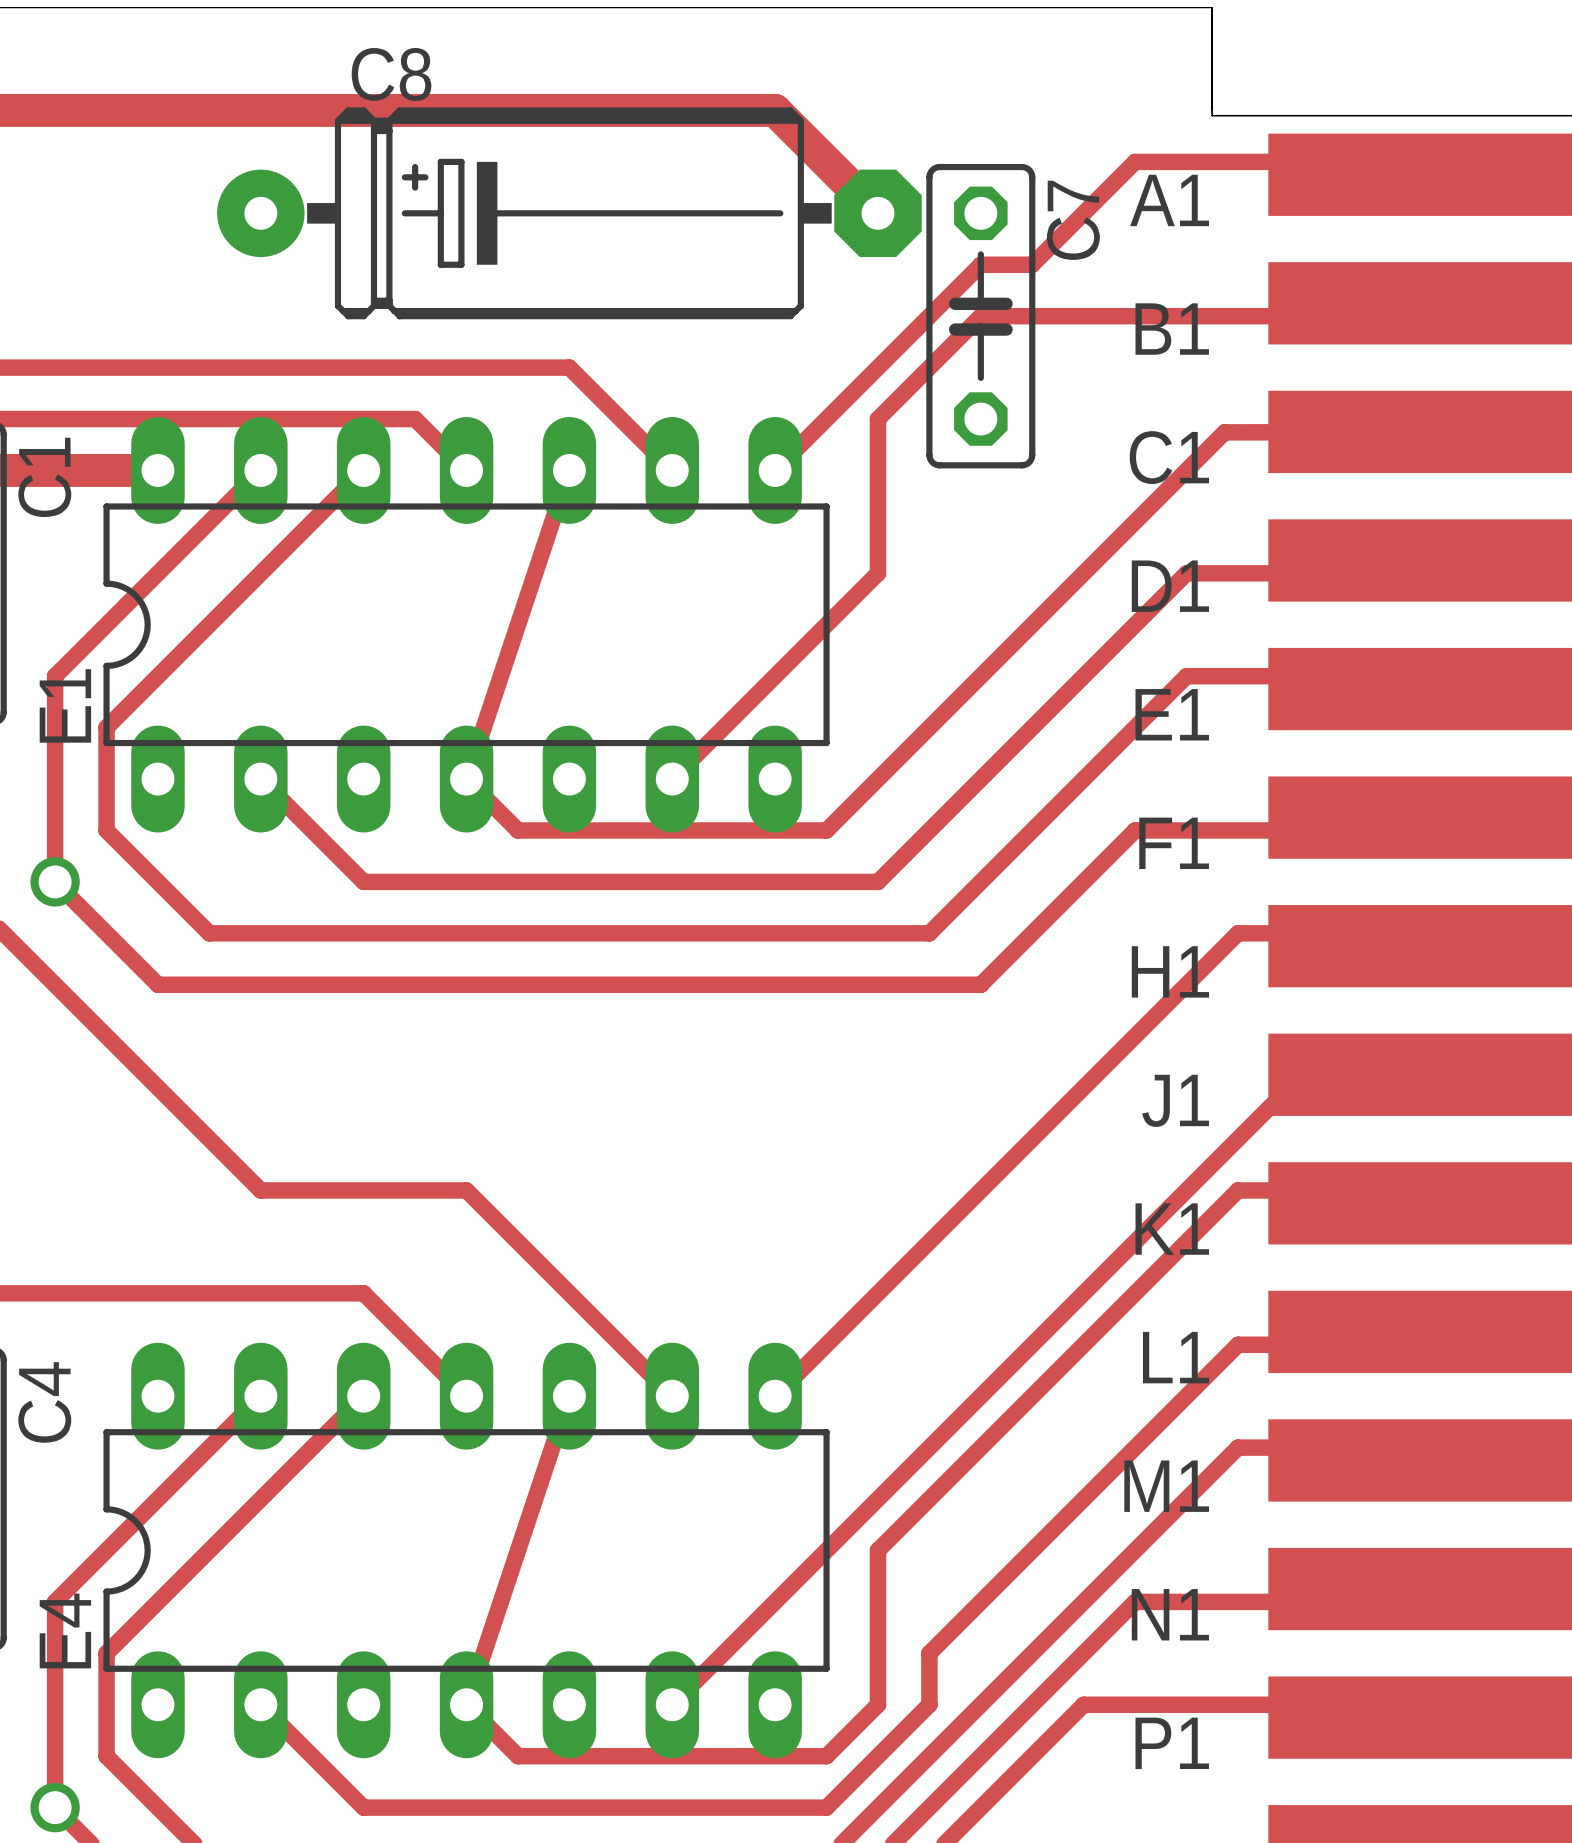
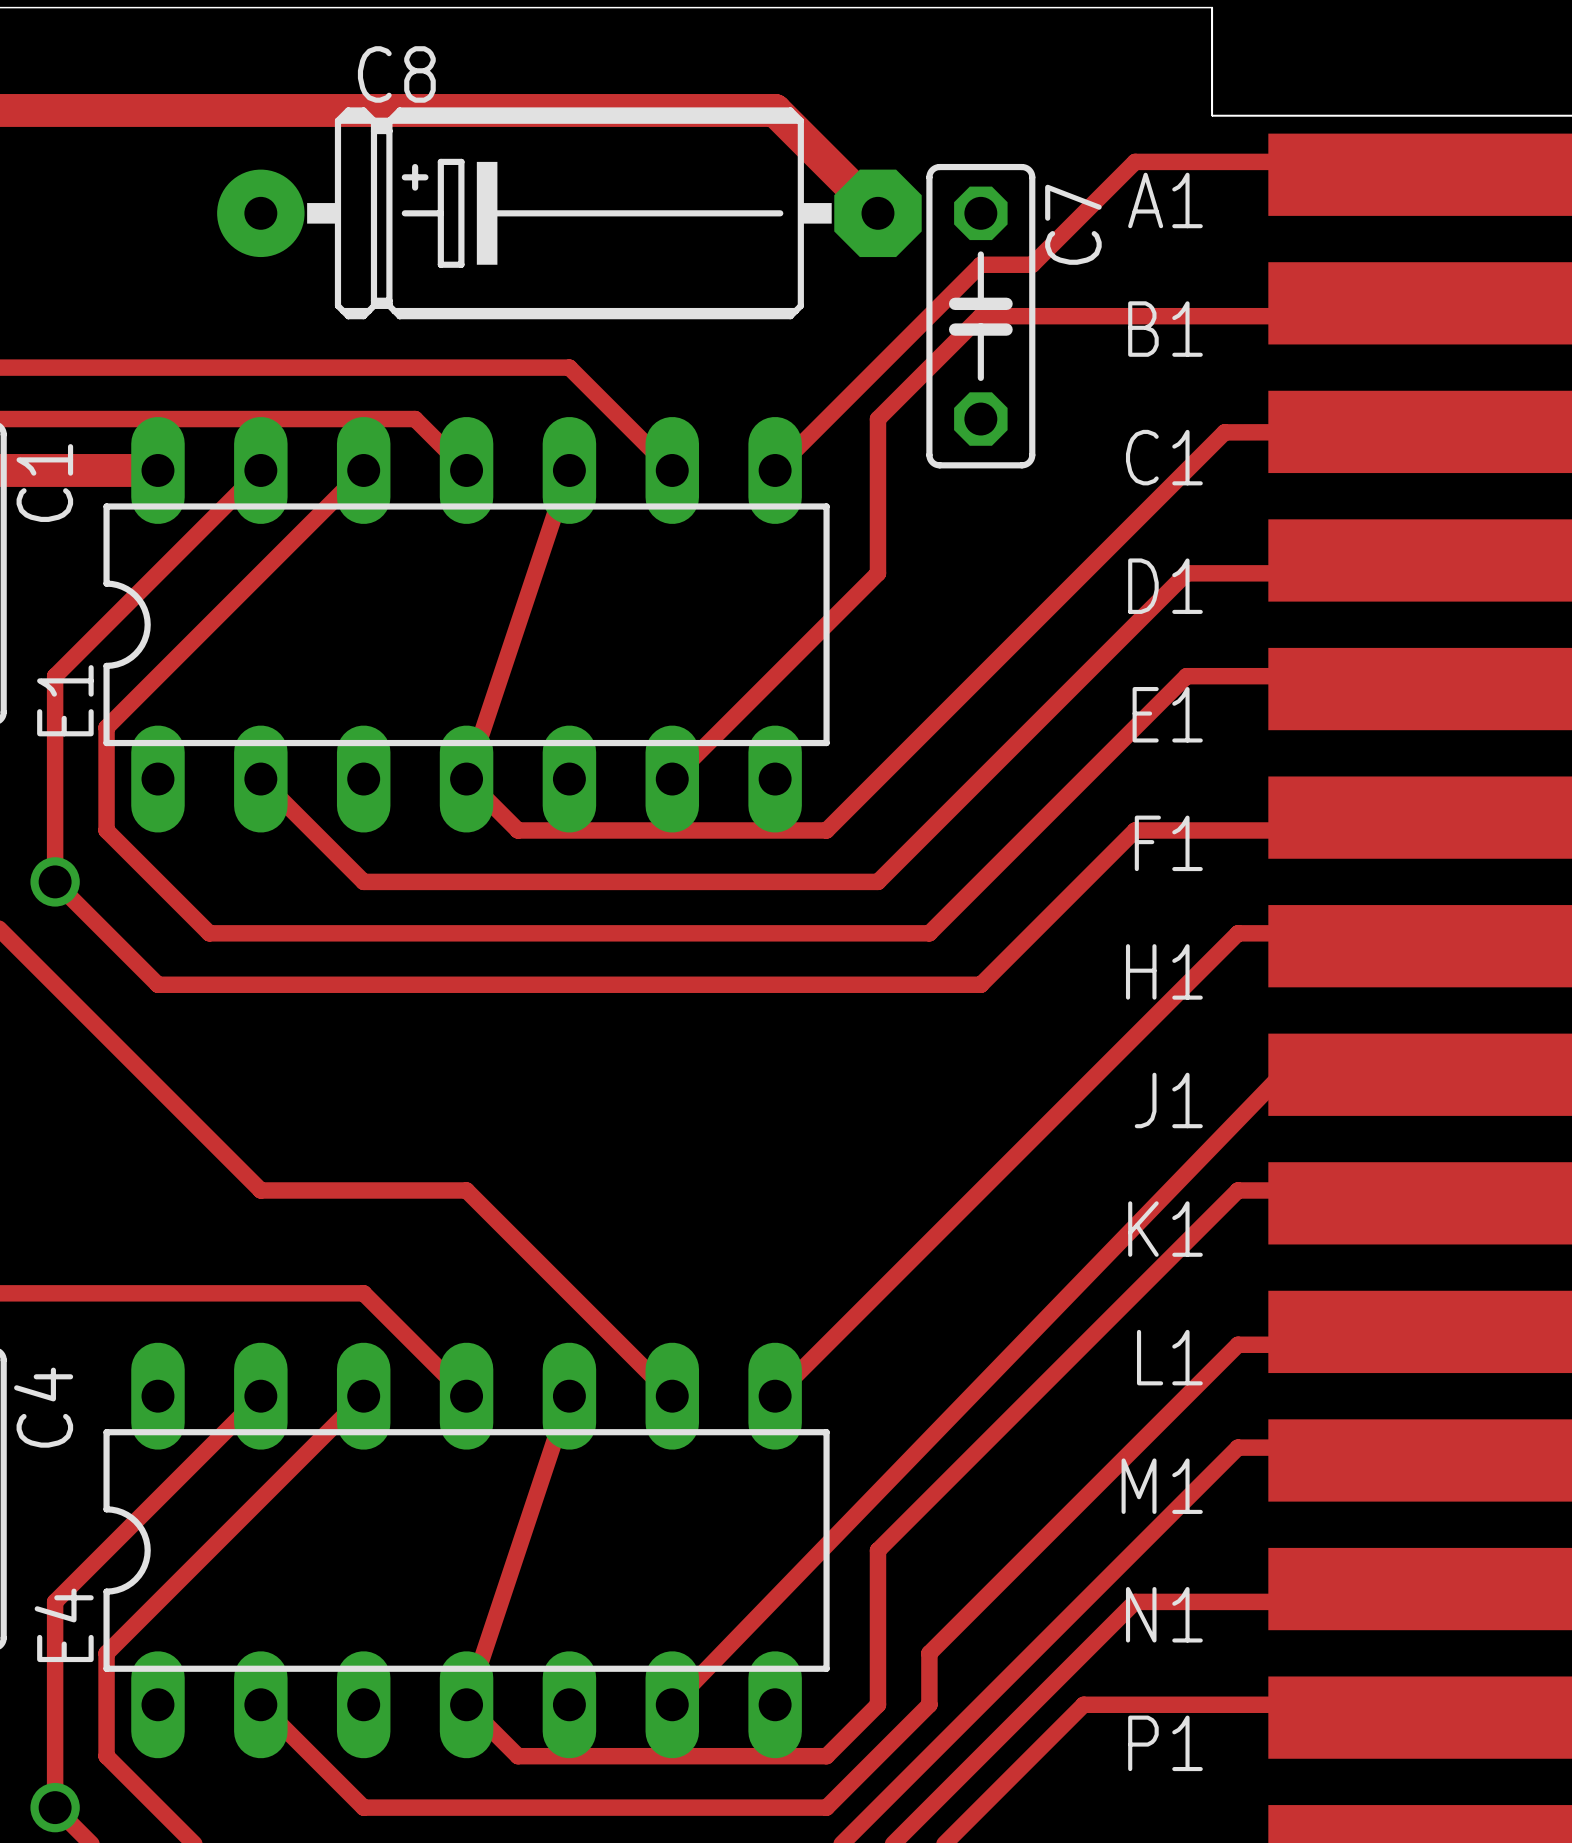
track: (1533, 1074) (1302, 1074) (672, 1704) -> (1533, 1074) (1282, 1074) (672, 1704)

